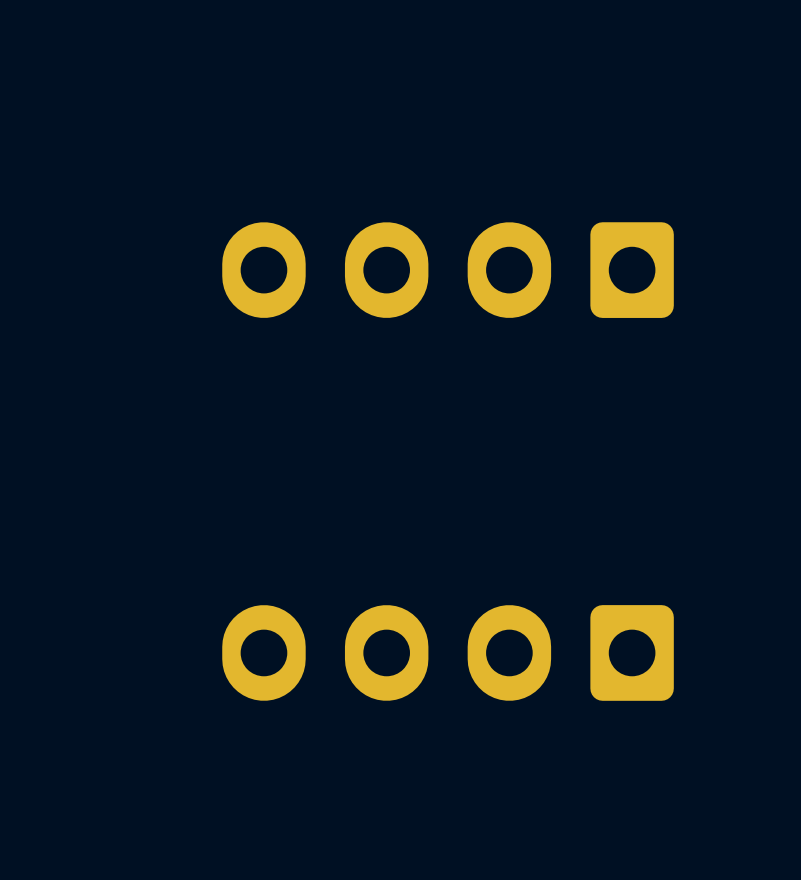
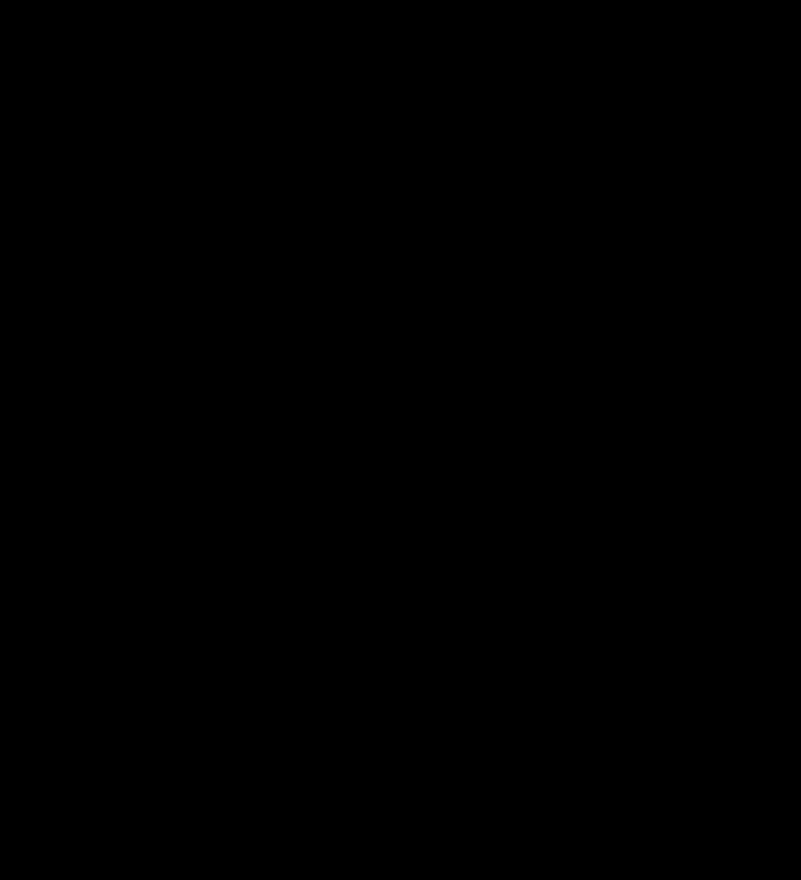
part: (448, 270) -> none
part: (448, 652) -> none

